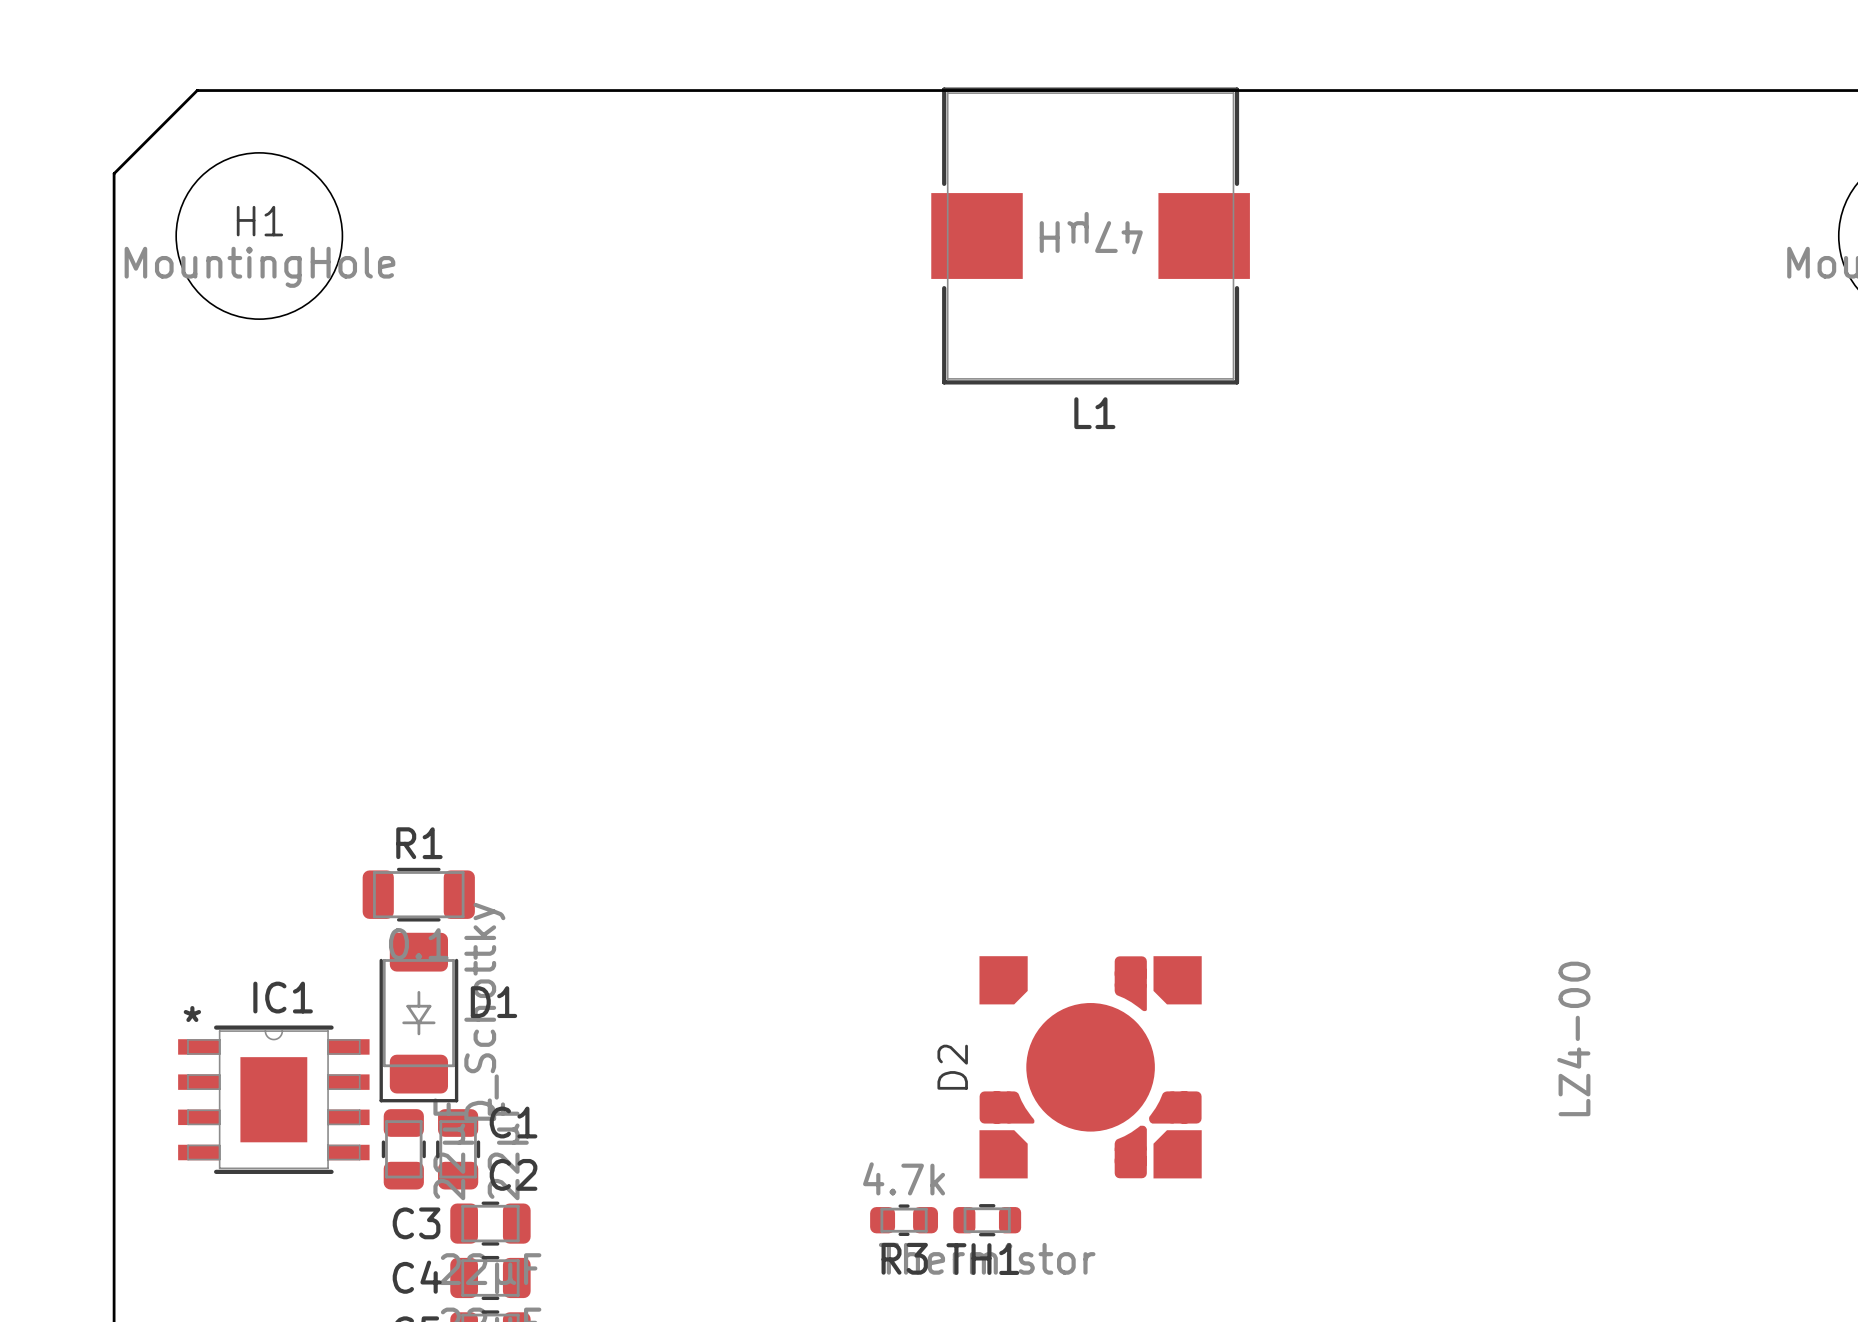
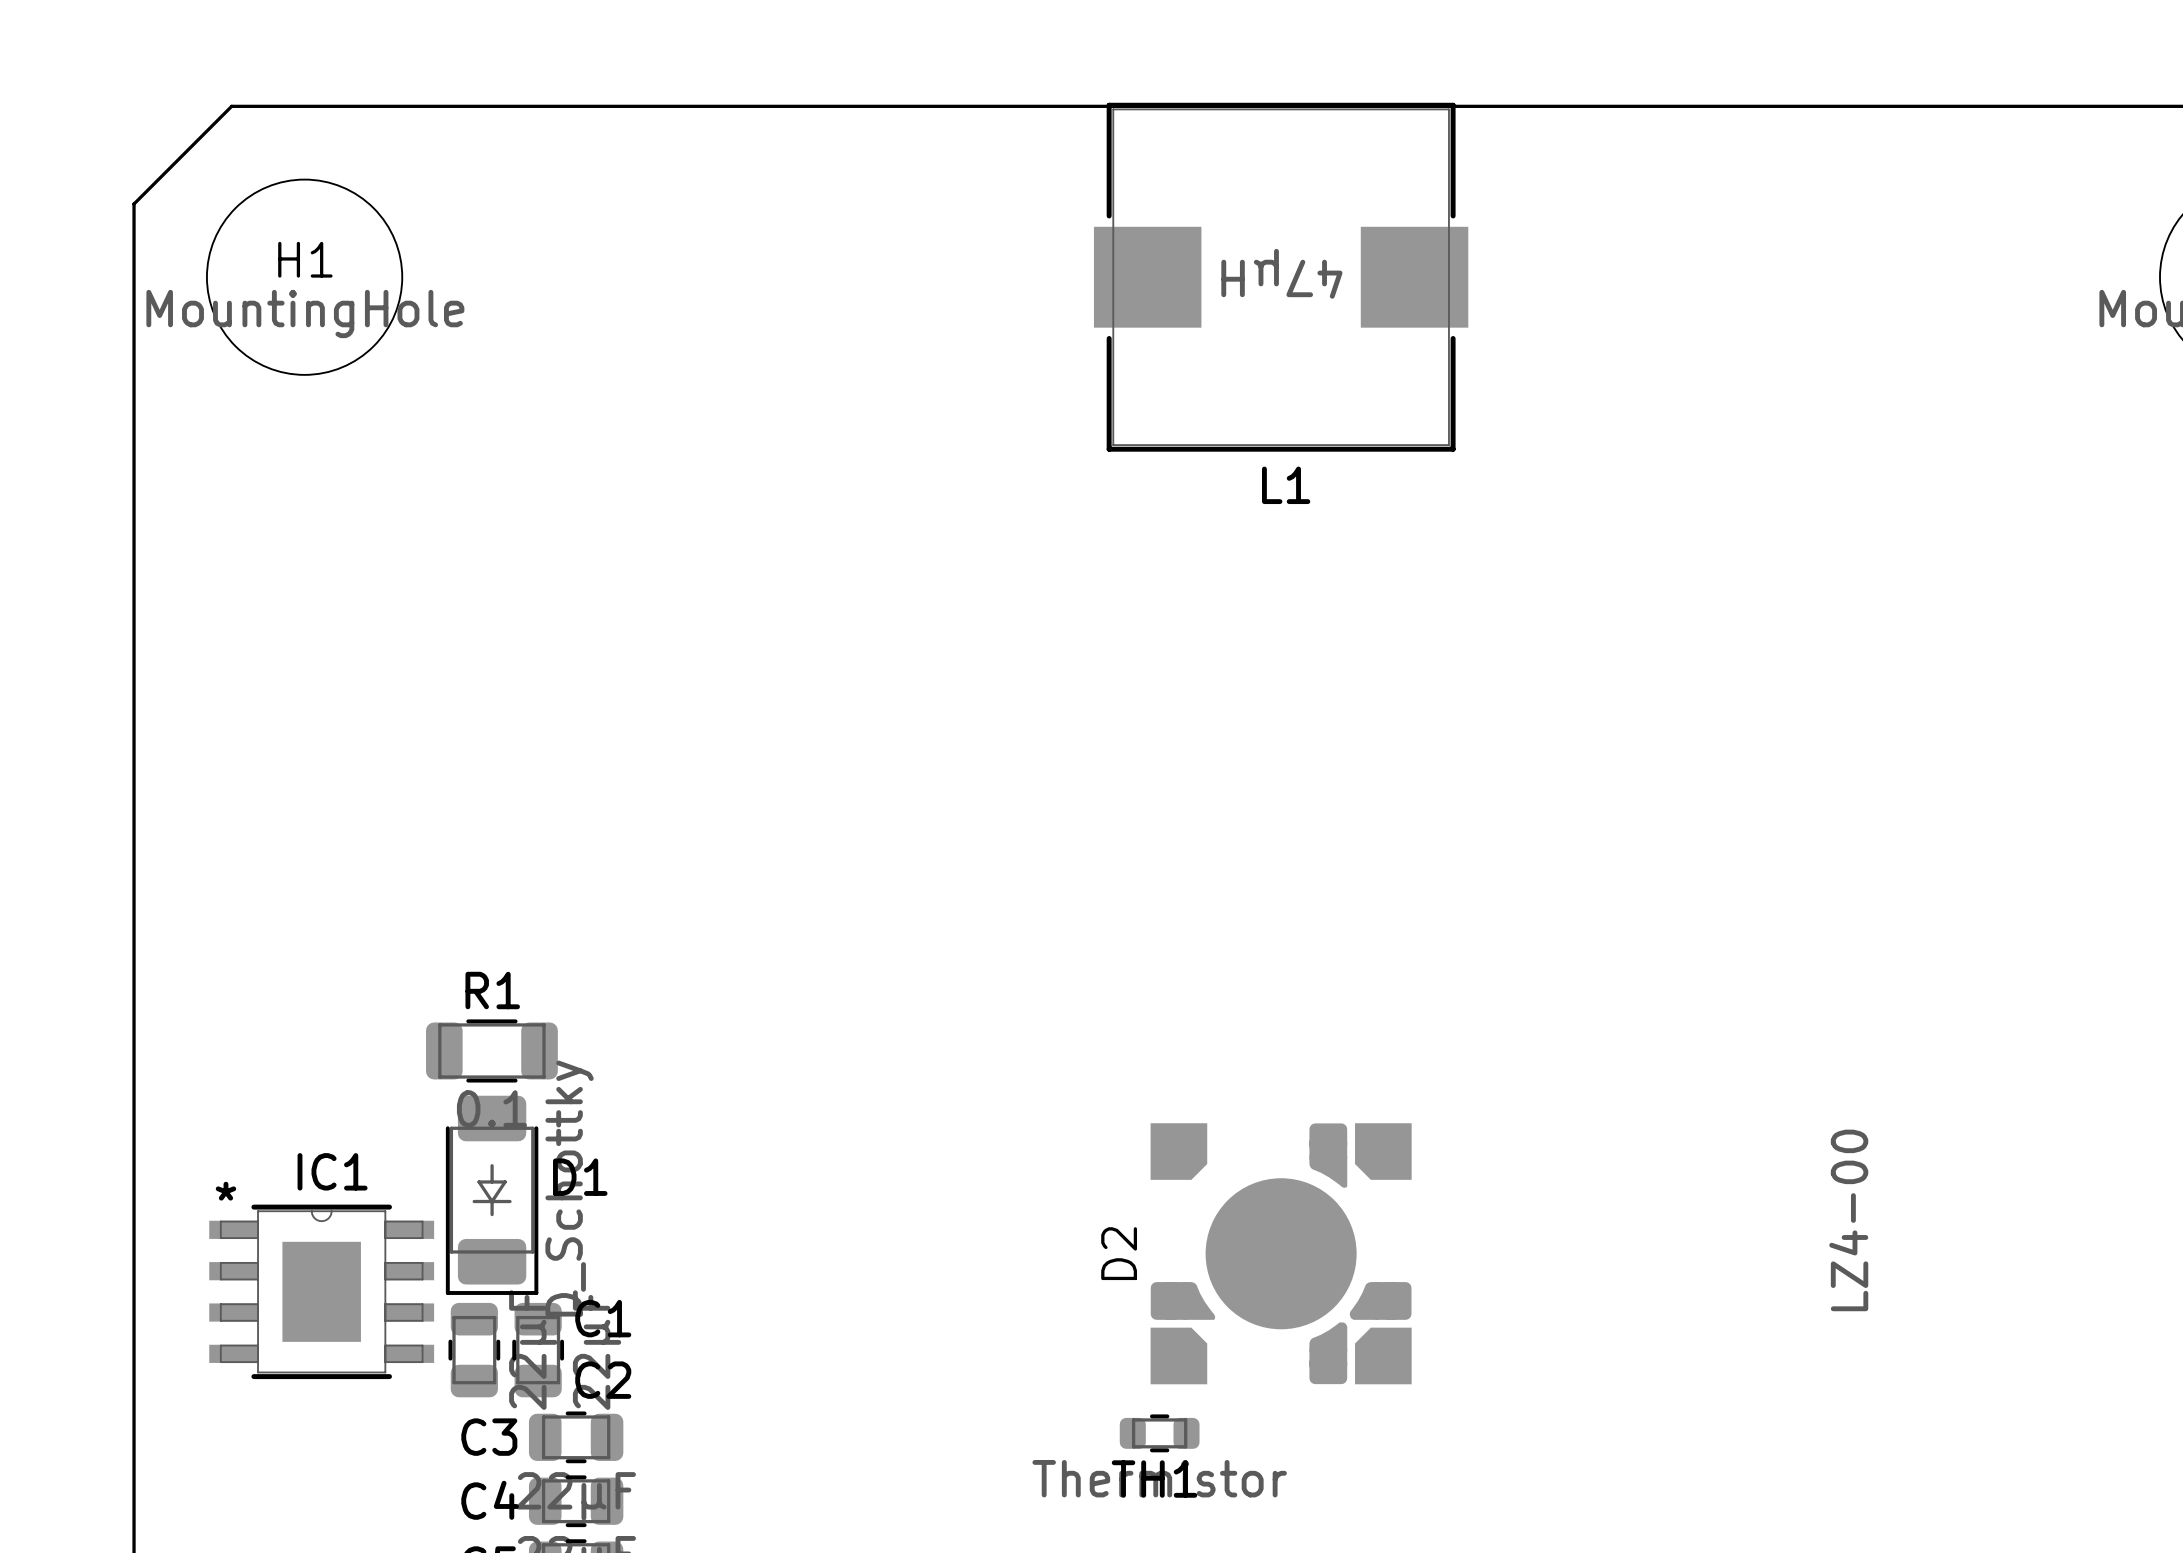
R3: 4.7k (904, 1220) -> none

